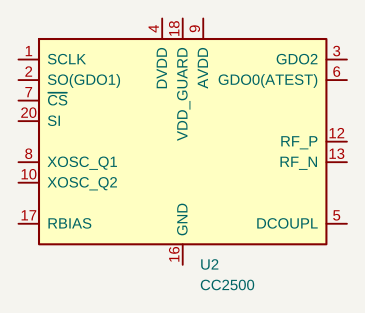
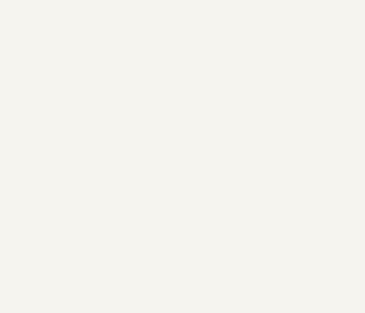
U2: CC2500 (182, 141) -> none

